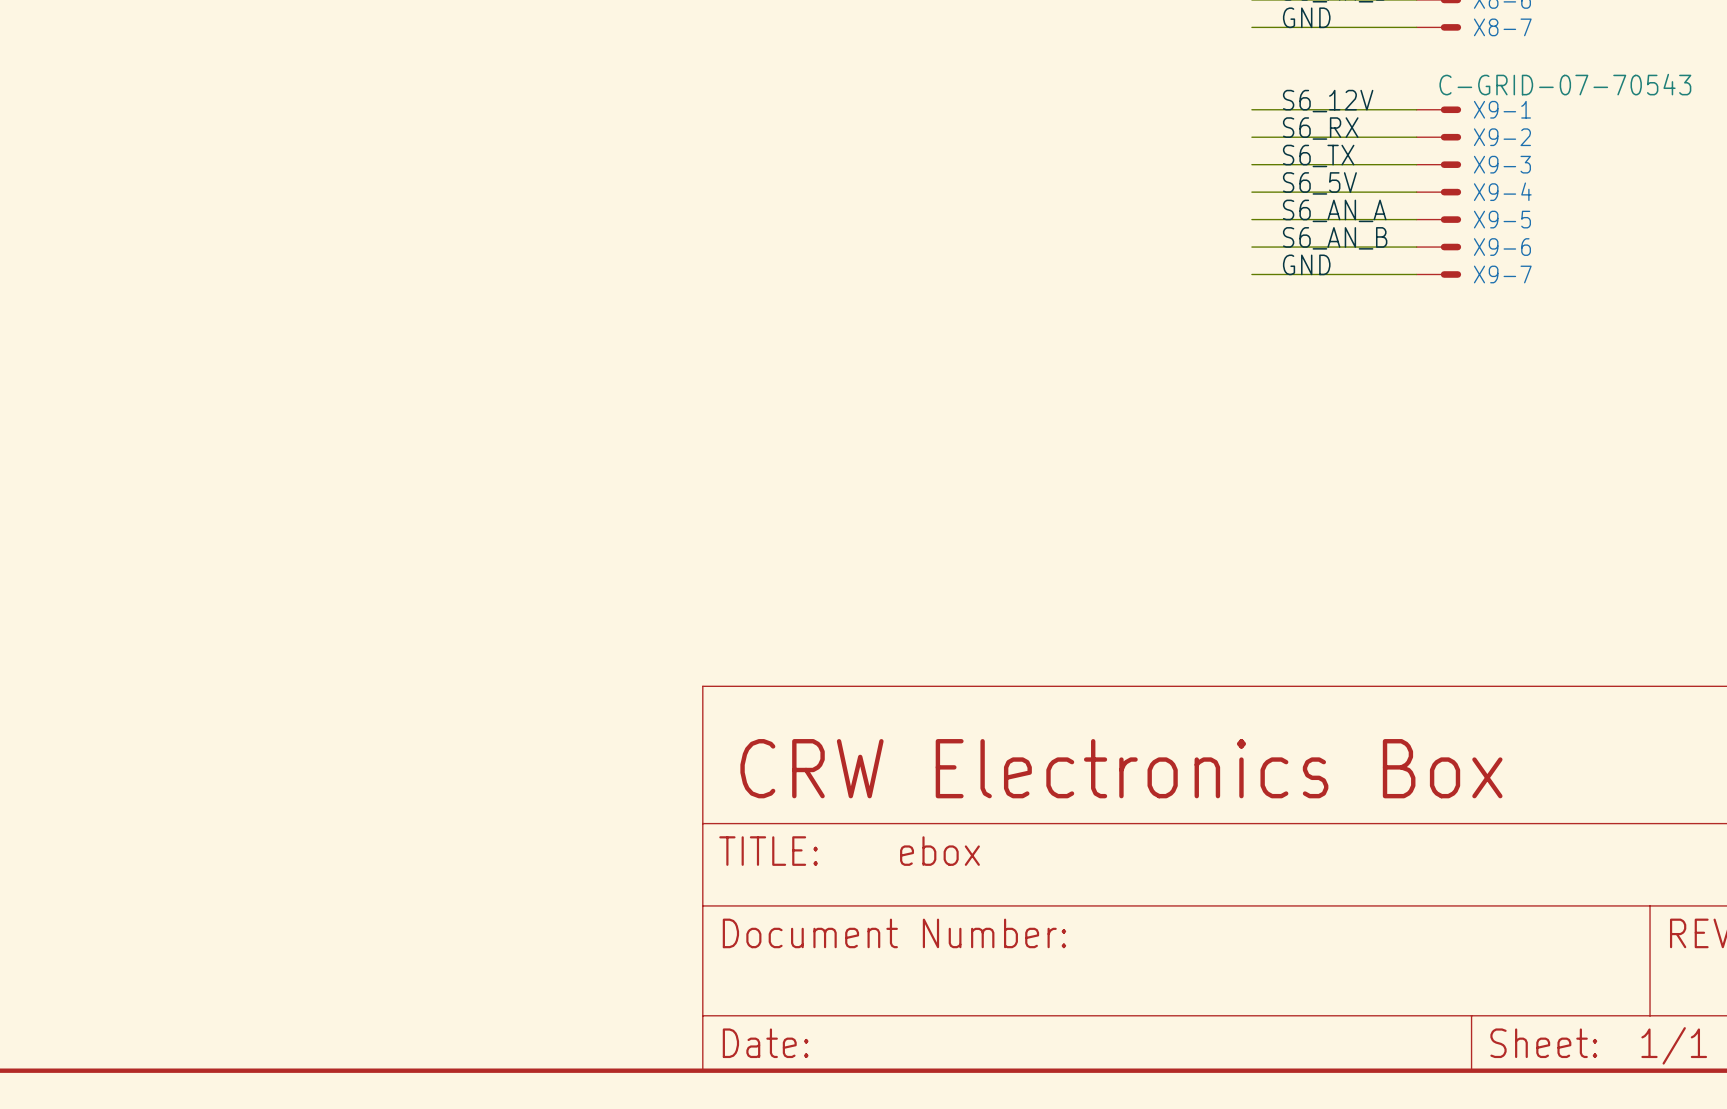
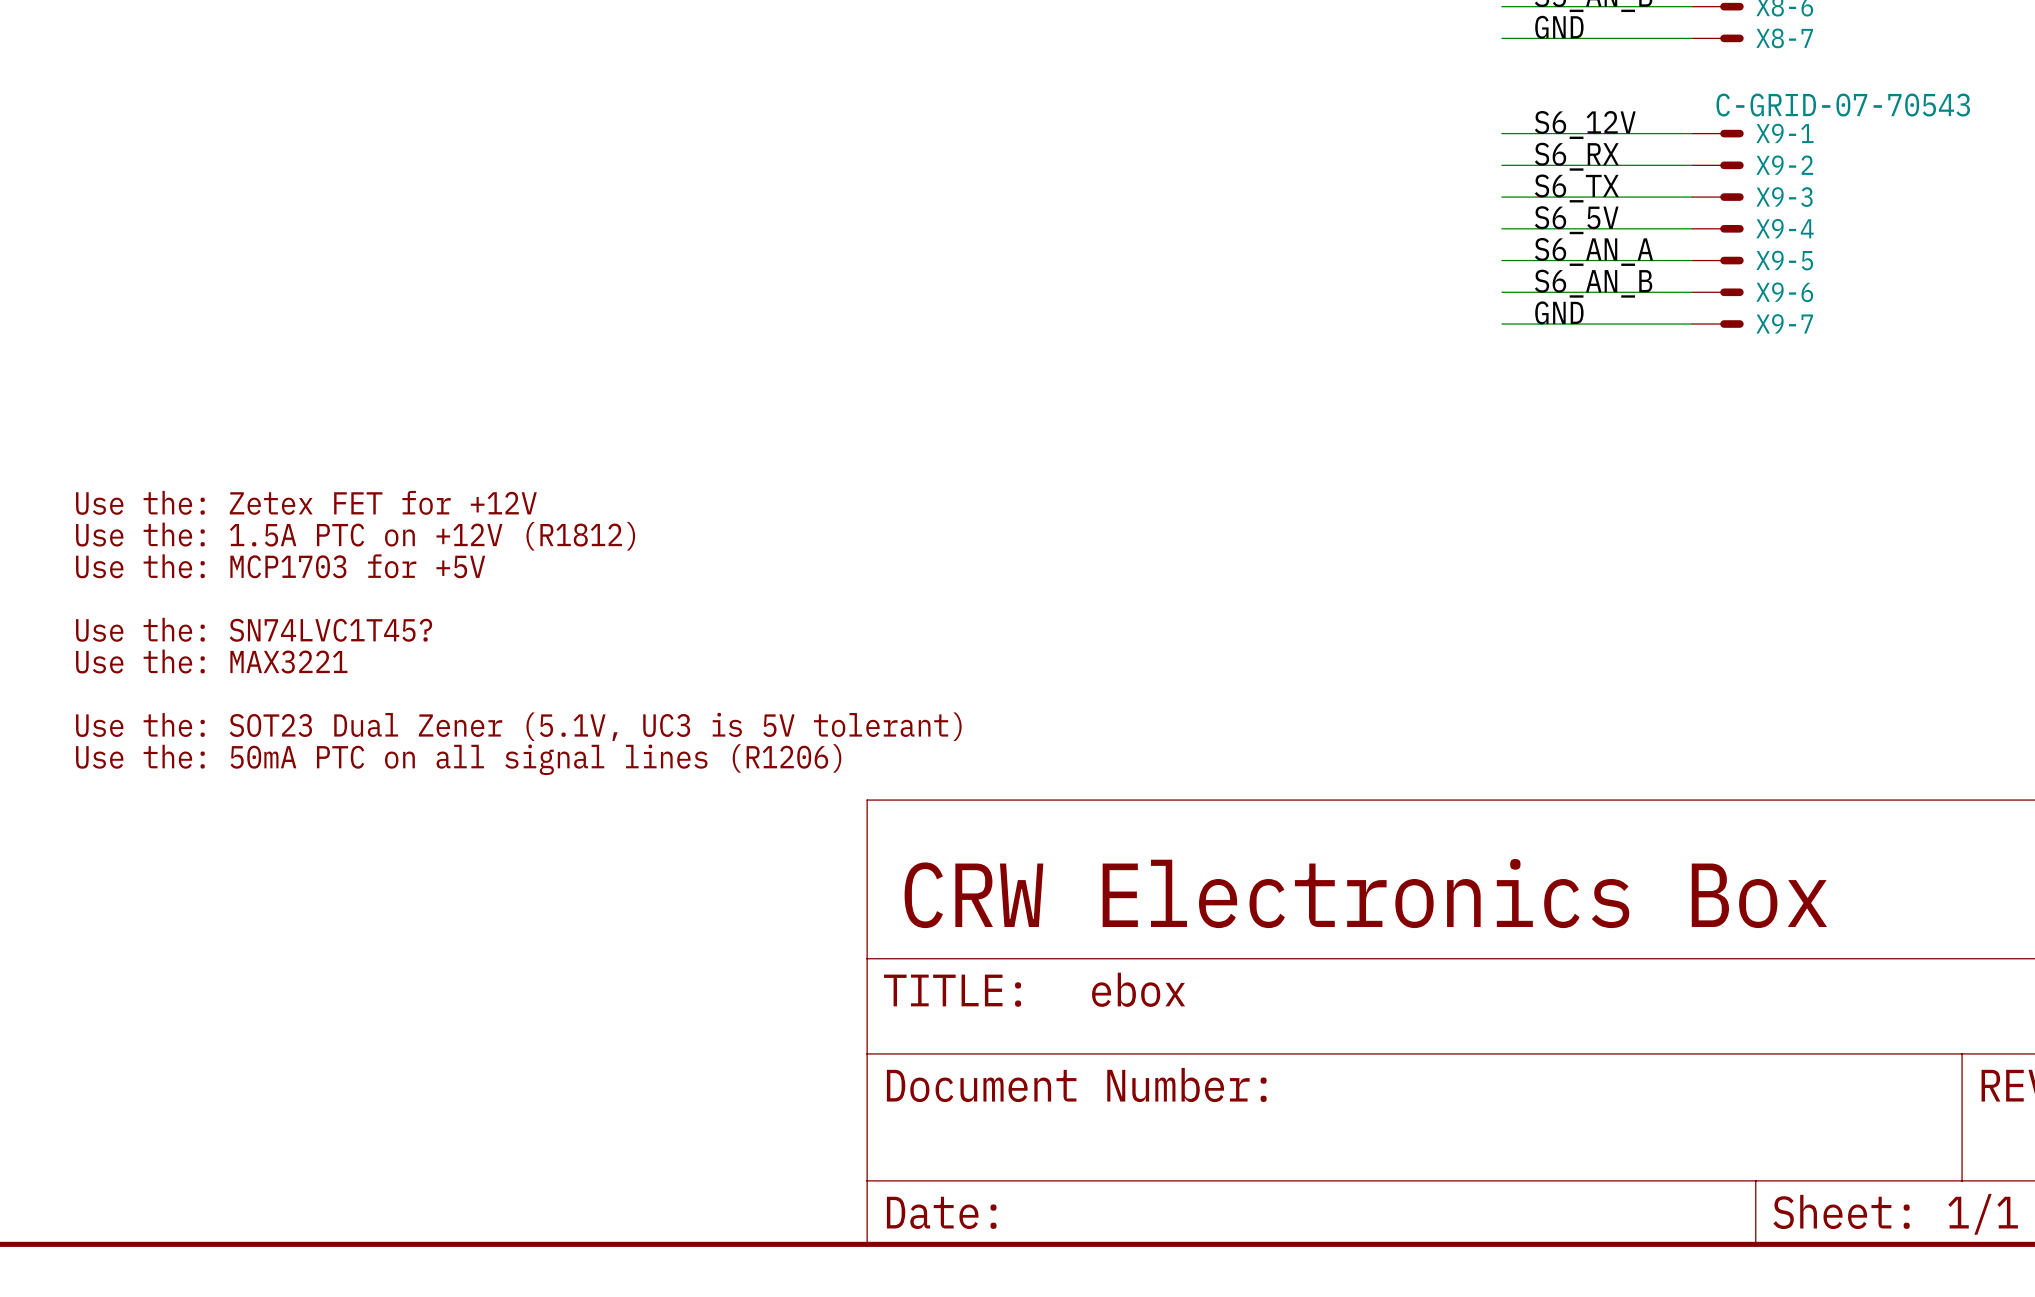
text: none -> Use the: Zetex FET for +12V (306, 502)
text: none -> Use the: 1.5A PTC on +12V (R1812) (355, 536)
text: none -> Use the: MCP1703 for +5V (280, 566)
text: none -> Use the: SN74LVC1T45? (254, 629)
text: none -> Use the: MAX3221 (211, 661)
text: none -> Use the: SOT23 Dual Zener (5.1V, UC3 is 5V tolerant) (518, 726)
text: none -> Use the: 50mA PTC on all signal lines (R1206) (458, 759)

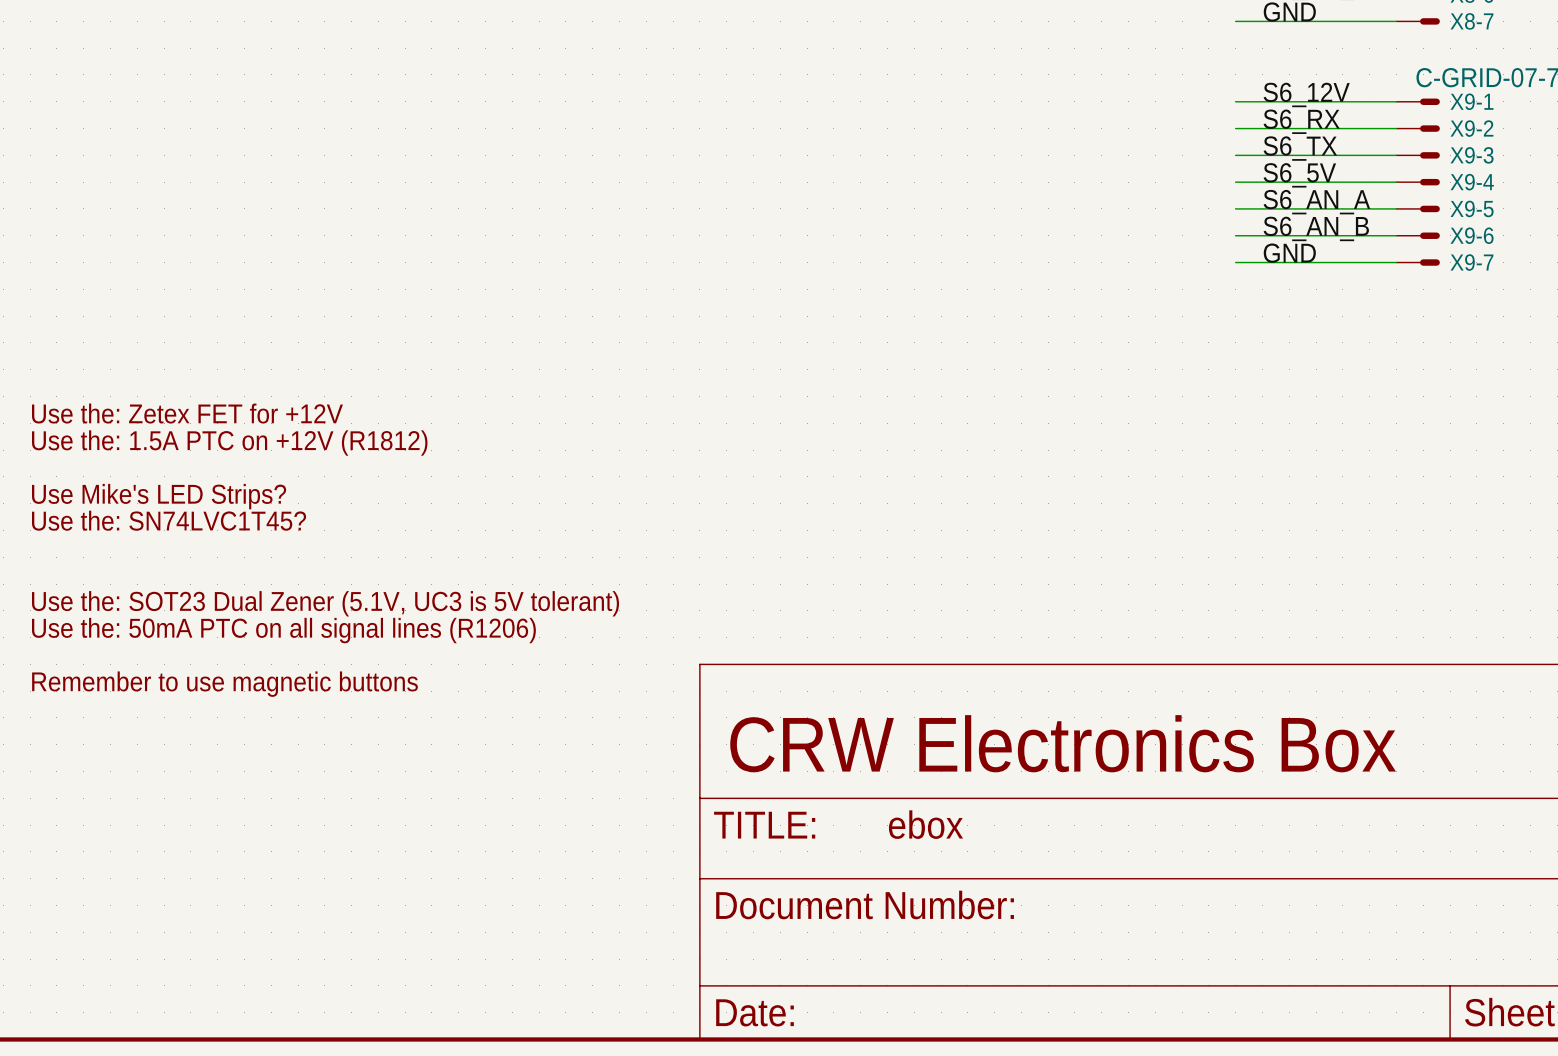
text: Use the: MCP1703 for +5V (280, 566) -> none
text: none -> Use Mike's LED Strips? (159, 496)
text: Use the: MAX3221 (211, 661) -> none
text: none -> Remember to use magnetic buttons (224, 684)

